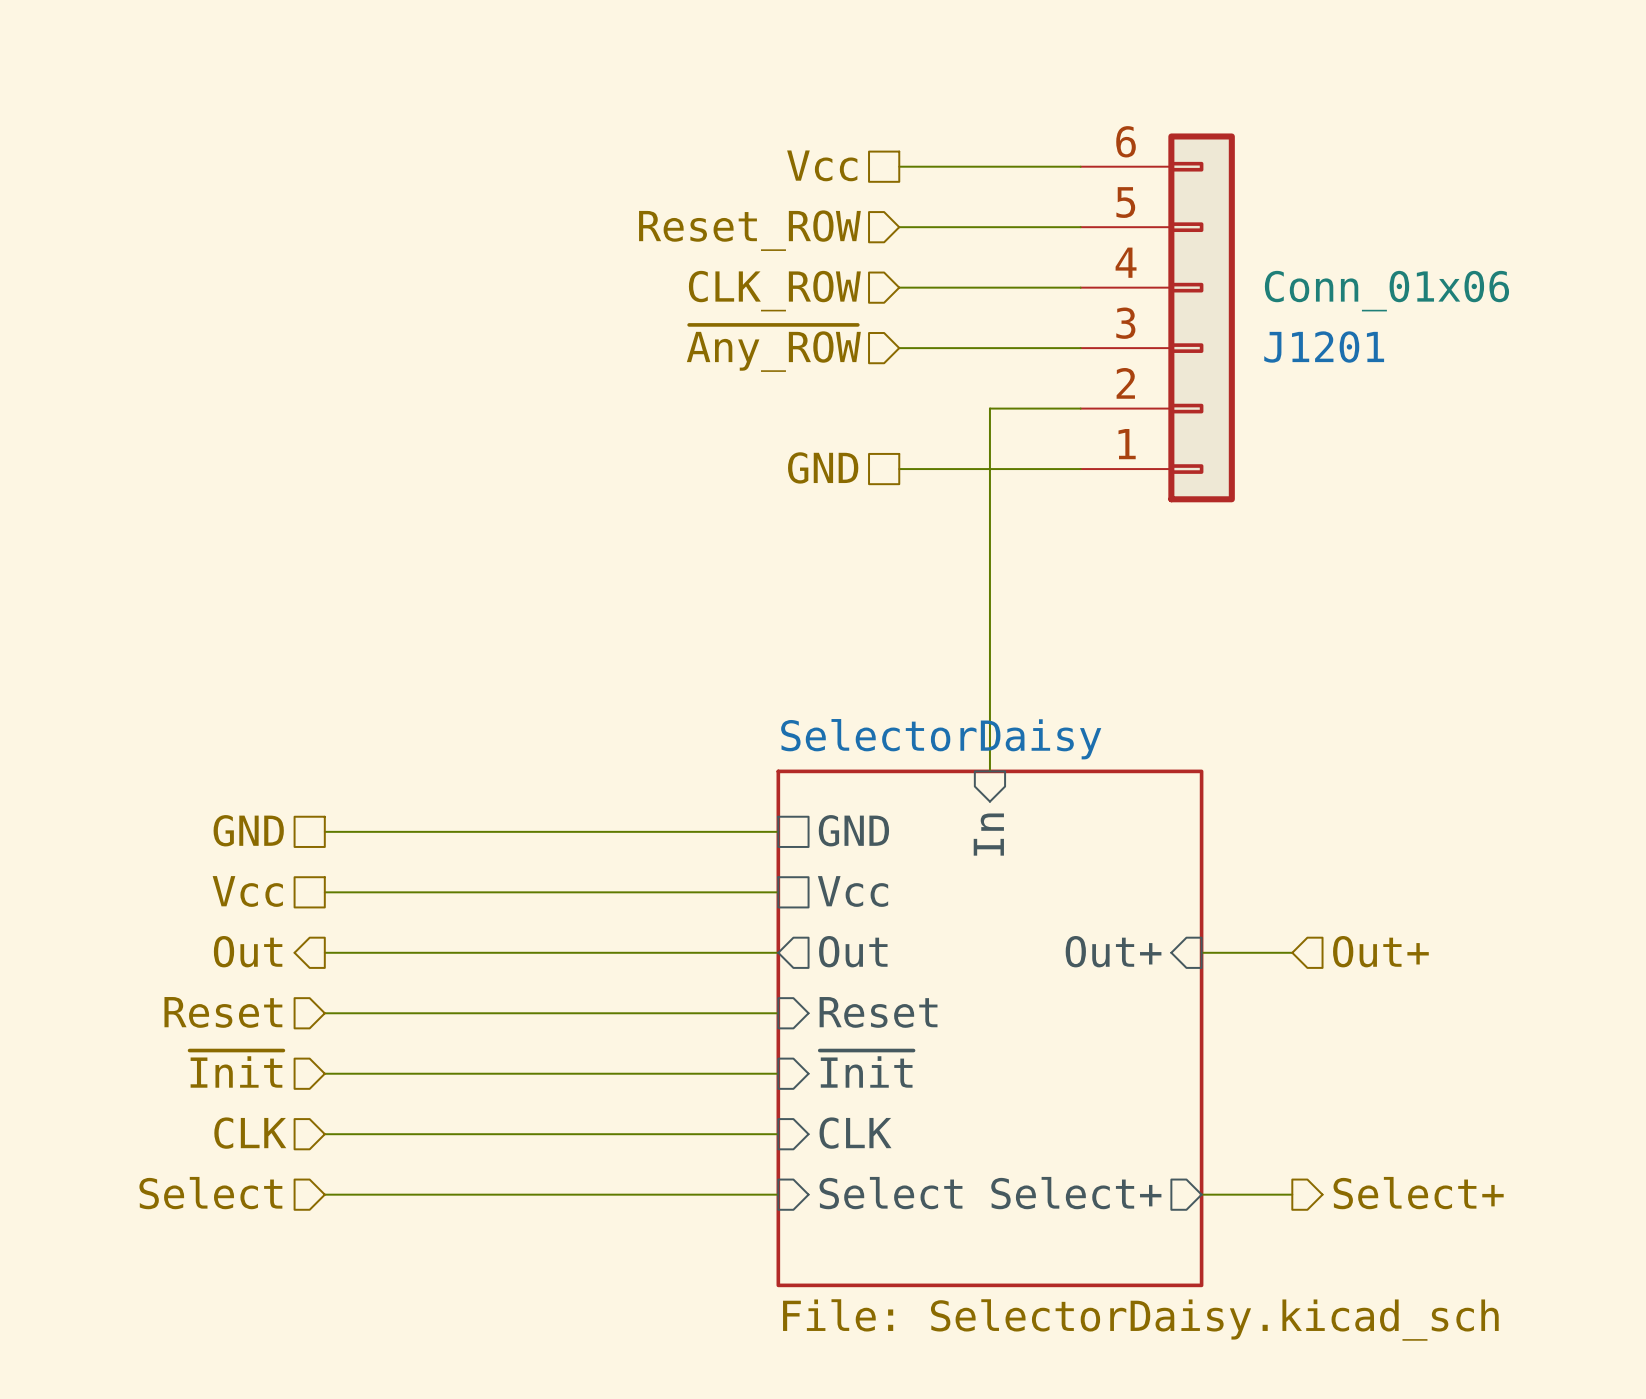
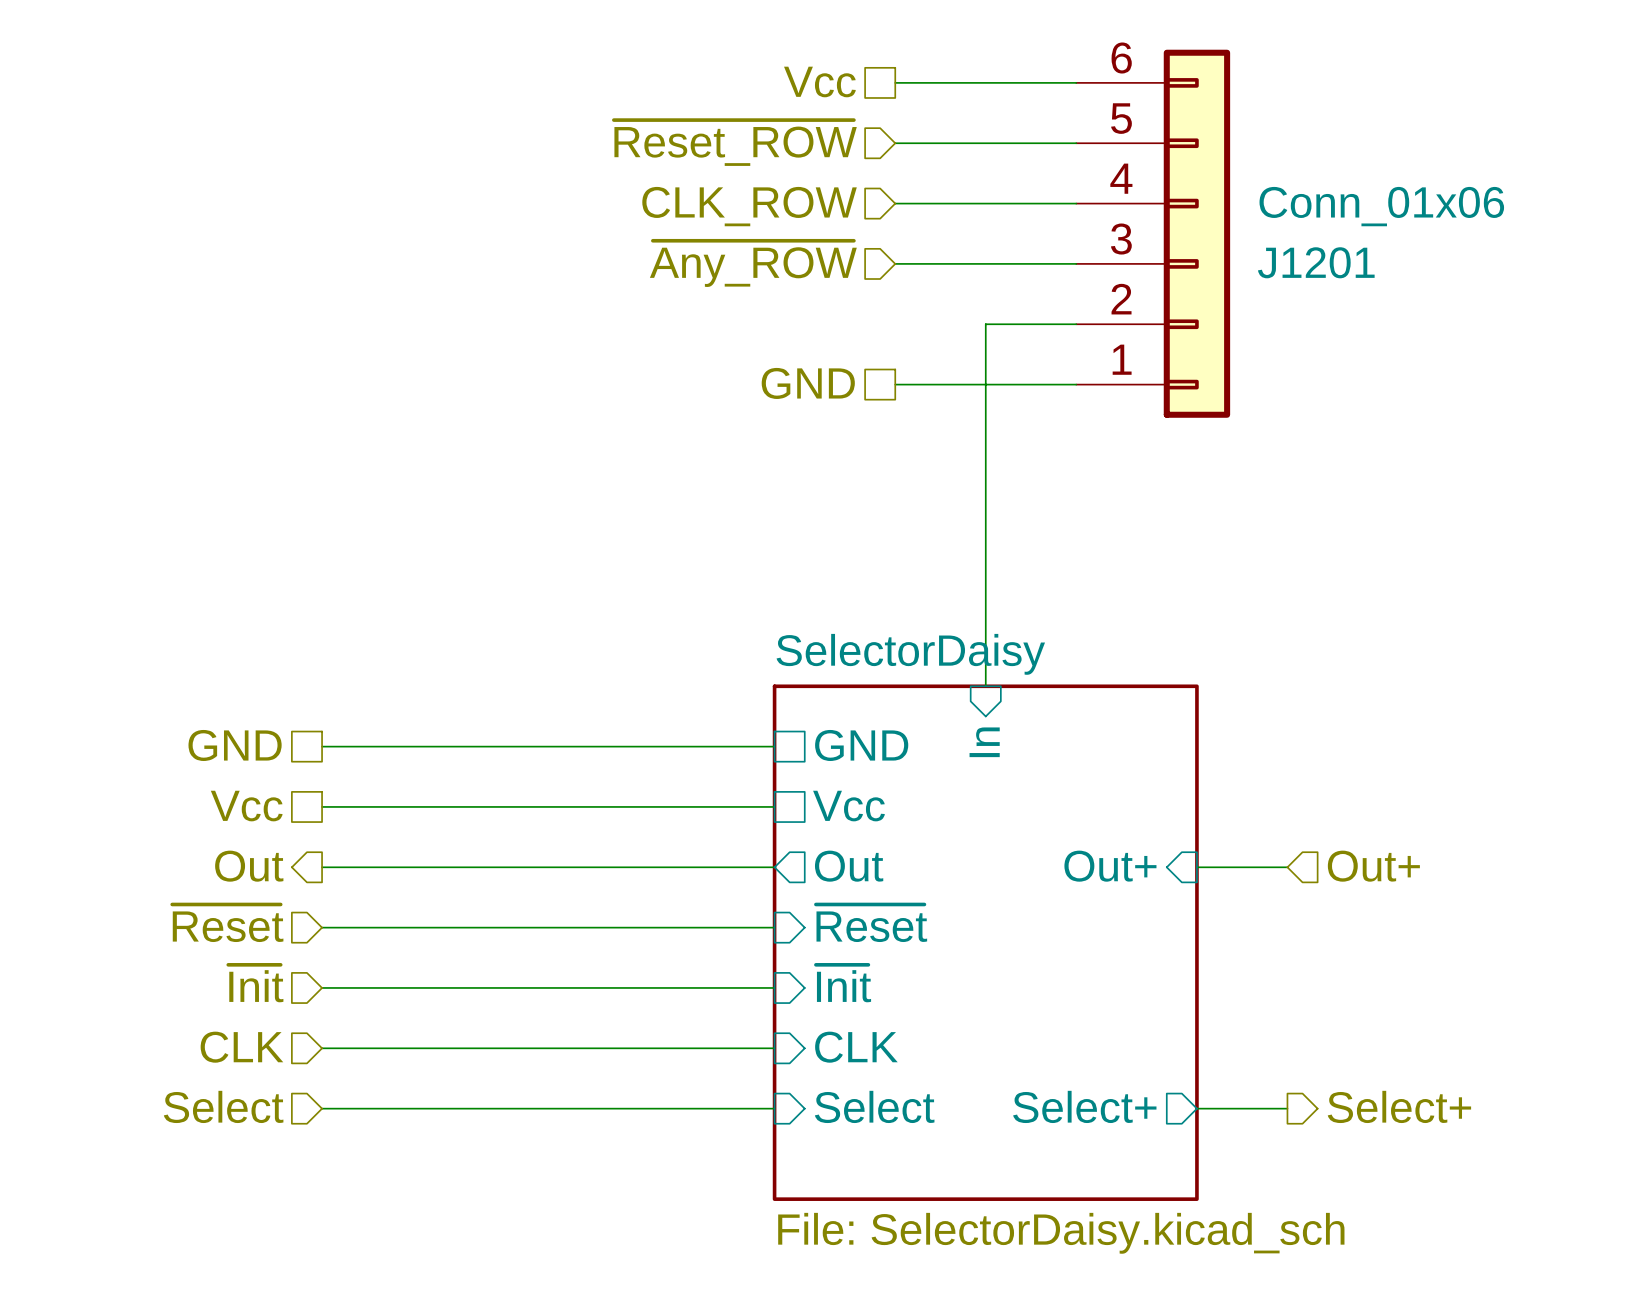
hierarchical label: Reset_ROW (749, 230) -> ~{Reset_ROW} (735, 143)
hierarchical label: Reset (223, 1012) -> ~{Reset} (227, 923)
sheet pin: Reset (878, 1012) -> ~{Reset} (871, 923)

